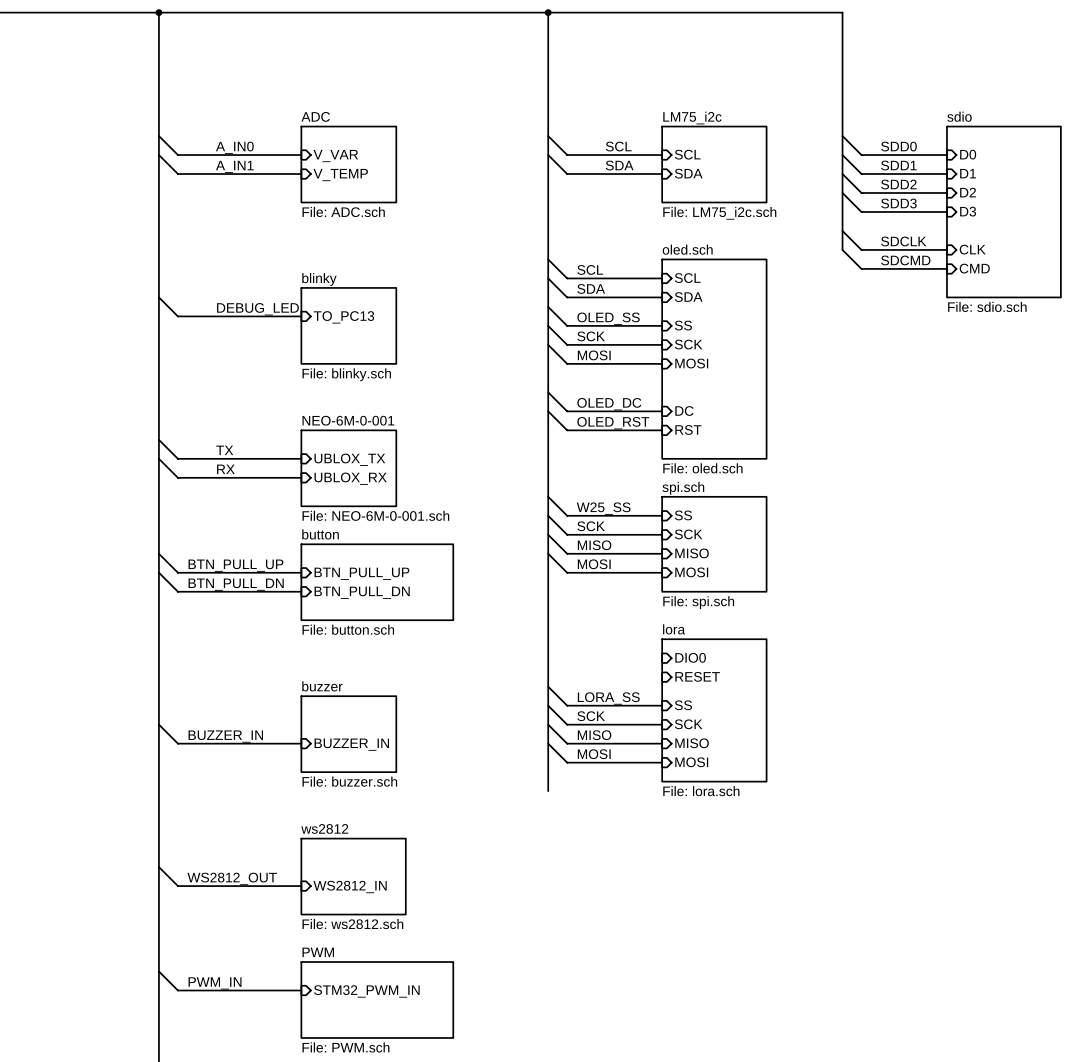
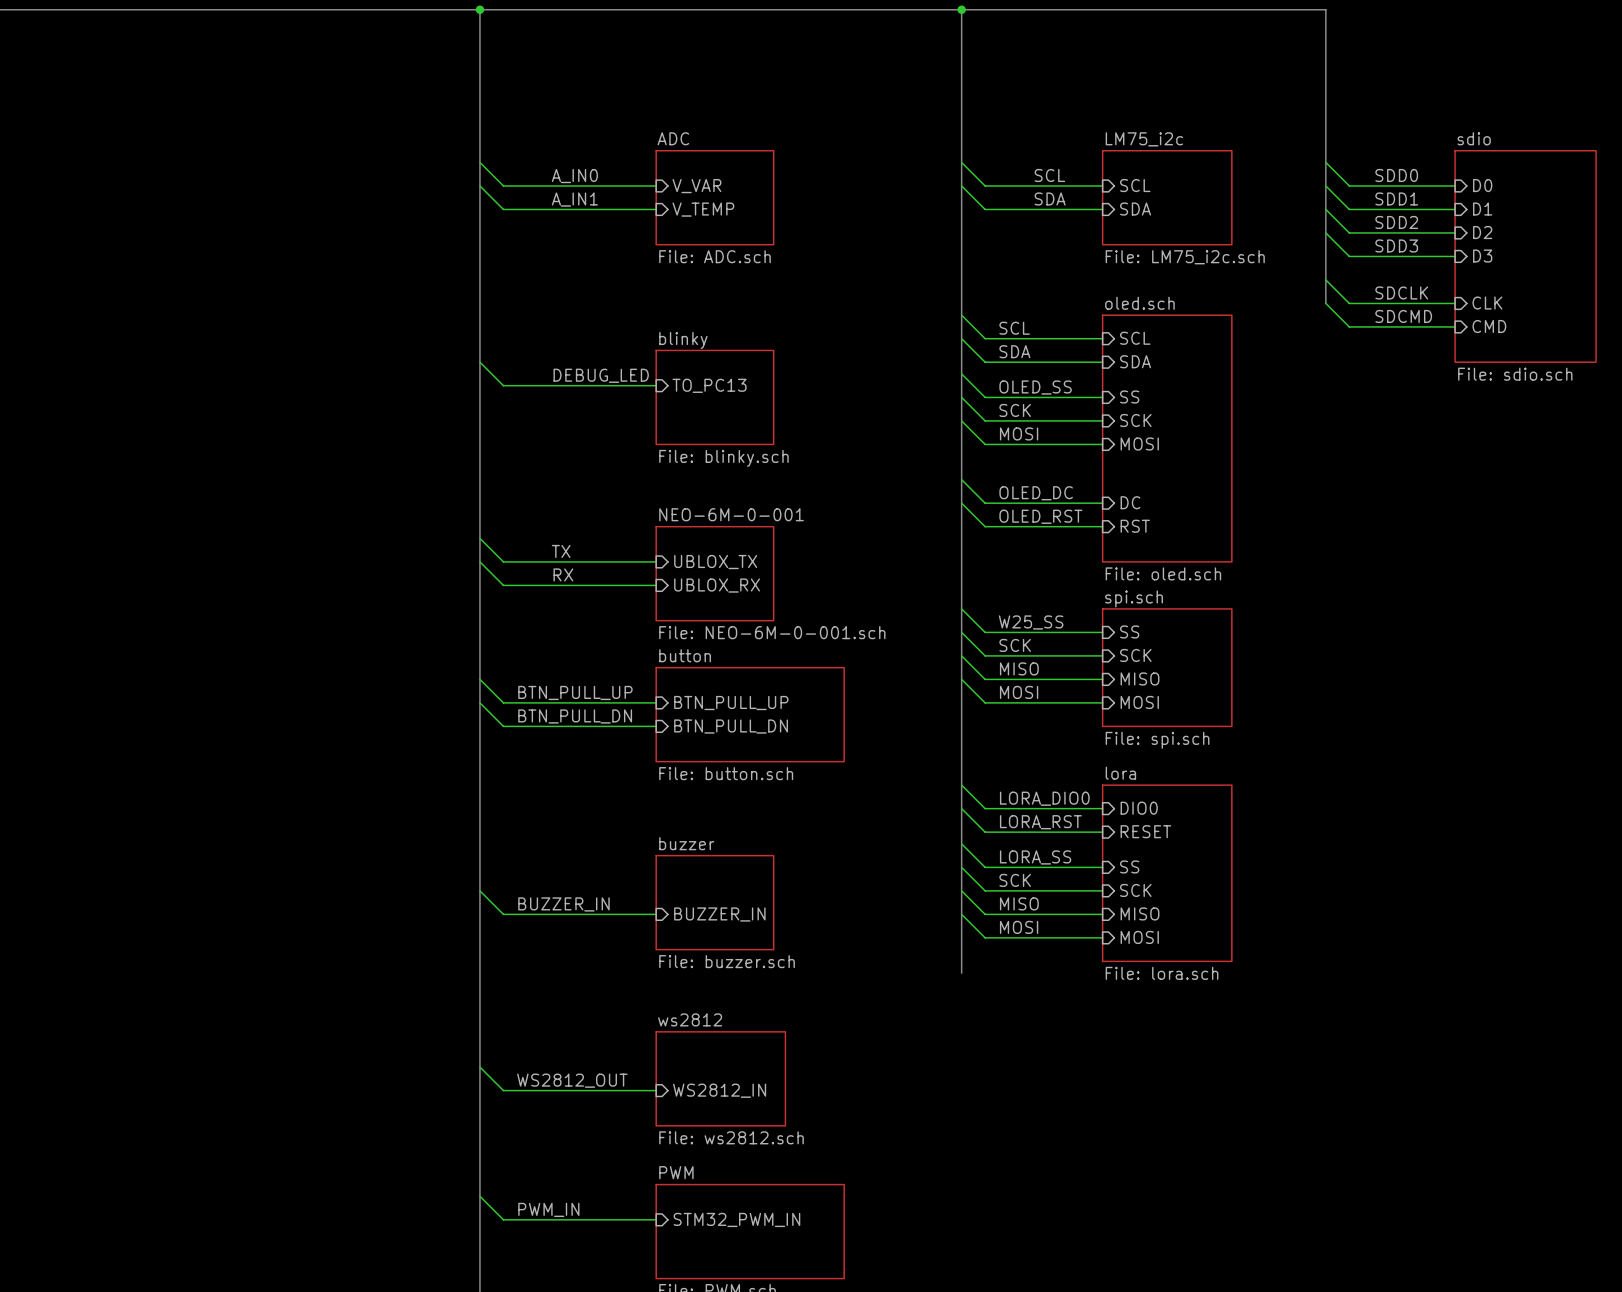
wire: none -> (961, 785) (985, 808) (1102, 808)
label: none -> LORA_DIO0 (1044, 798)
wire: none -> (961, 808) (985, 832) (1102, 832)
label: none -> LORA_RST (1040, 822)

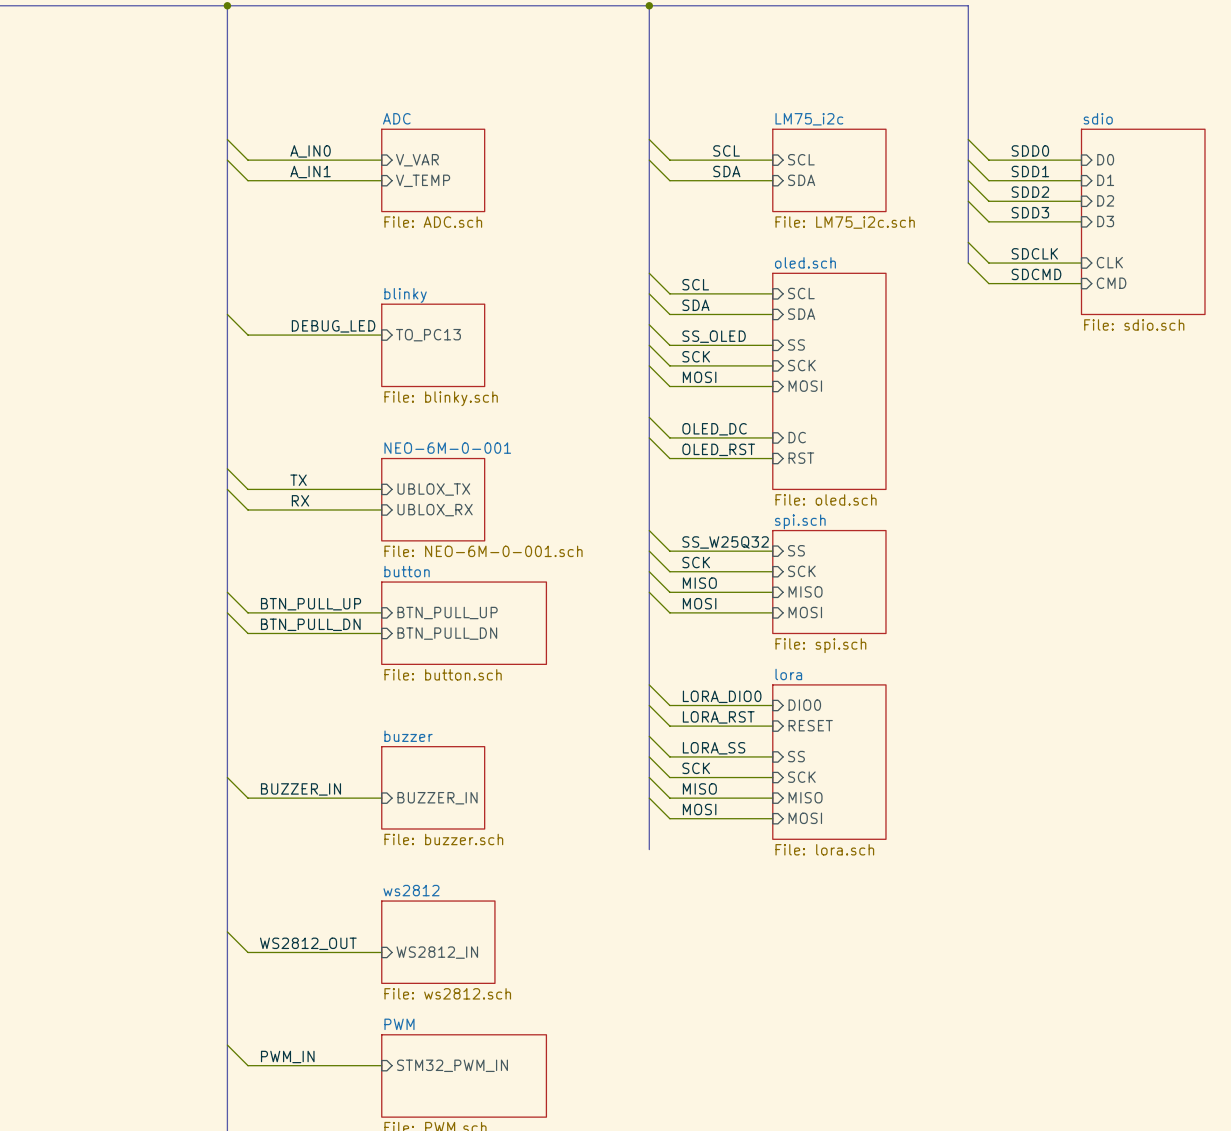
label: OLED_SS (1035, 387) -> SS_OLED (714, 336)
label: W25_SS (1031, 622) -> SS_W25Q32 (725, 542)

